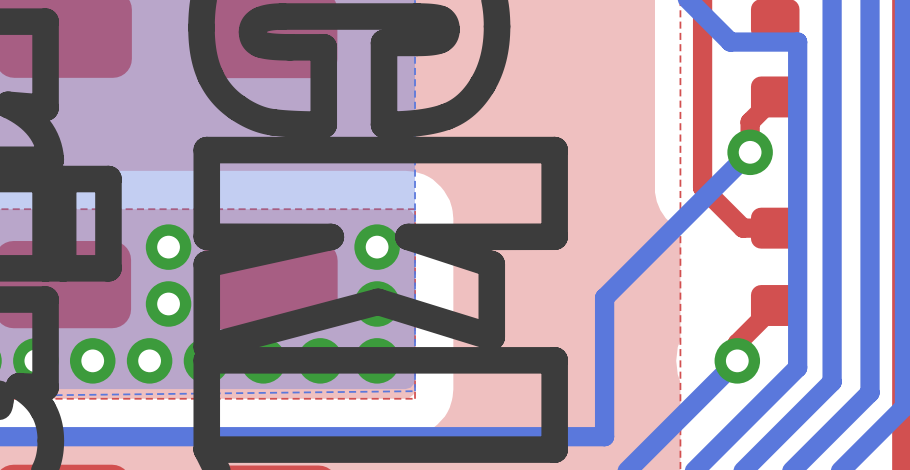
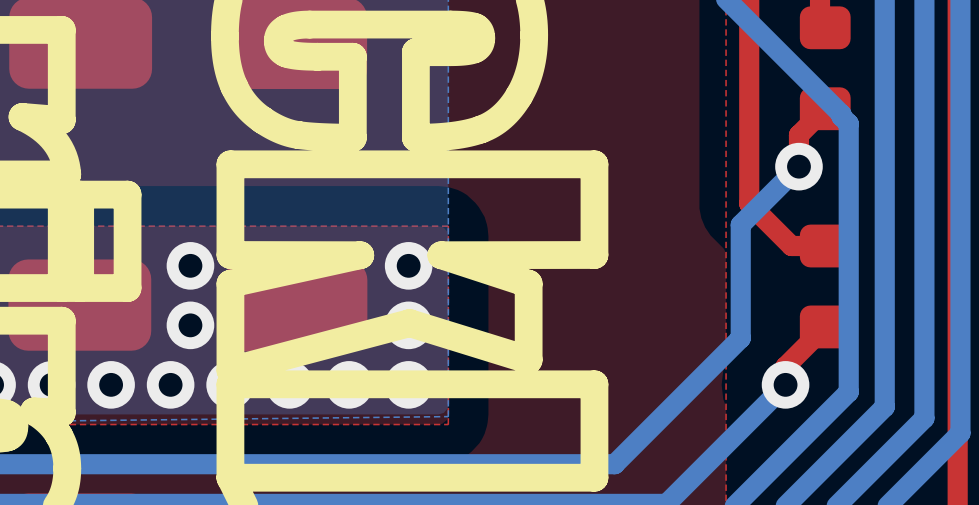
bottom track: (730, 42) (797, 42) (797, 111) -> (778, 51) (848, 123)
bottom track: (694, 207) (604, 297) (604, 436) (574, 436) -> (740, 224) (740, 338) (614, 464)

